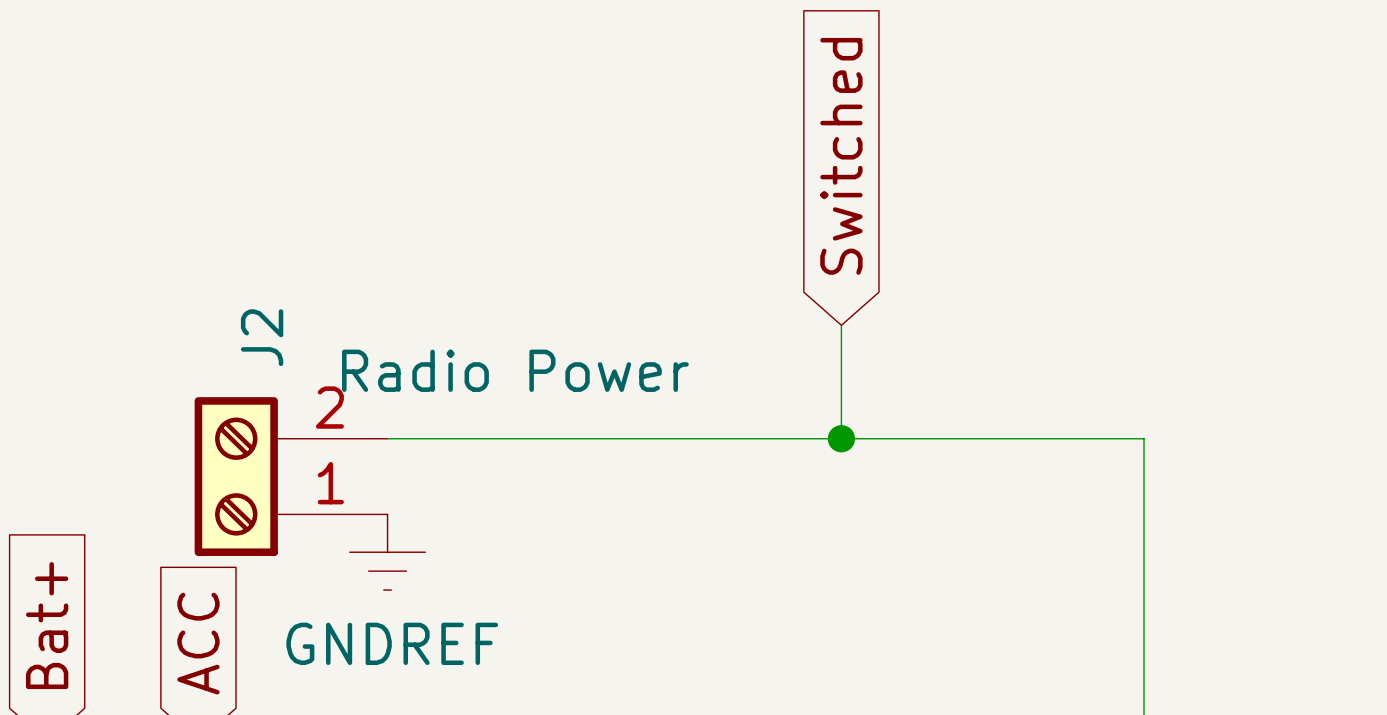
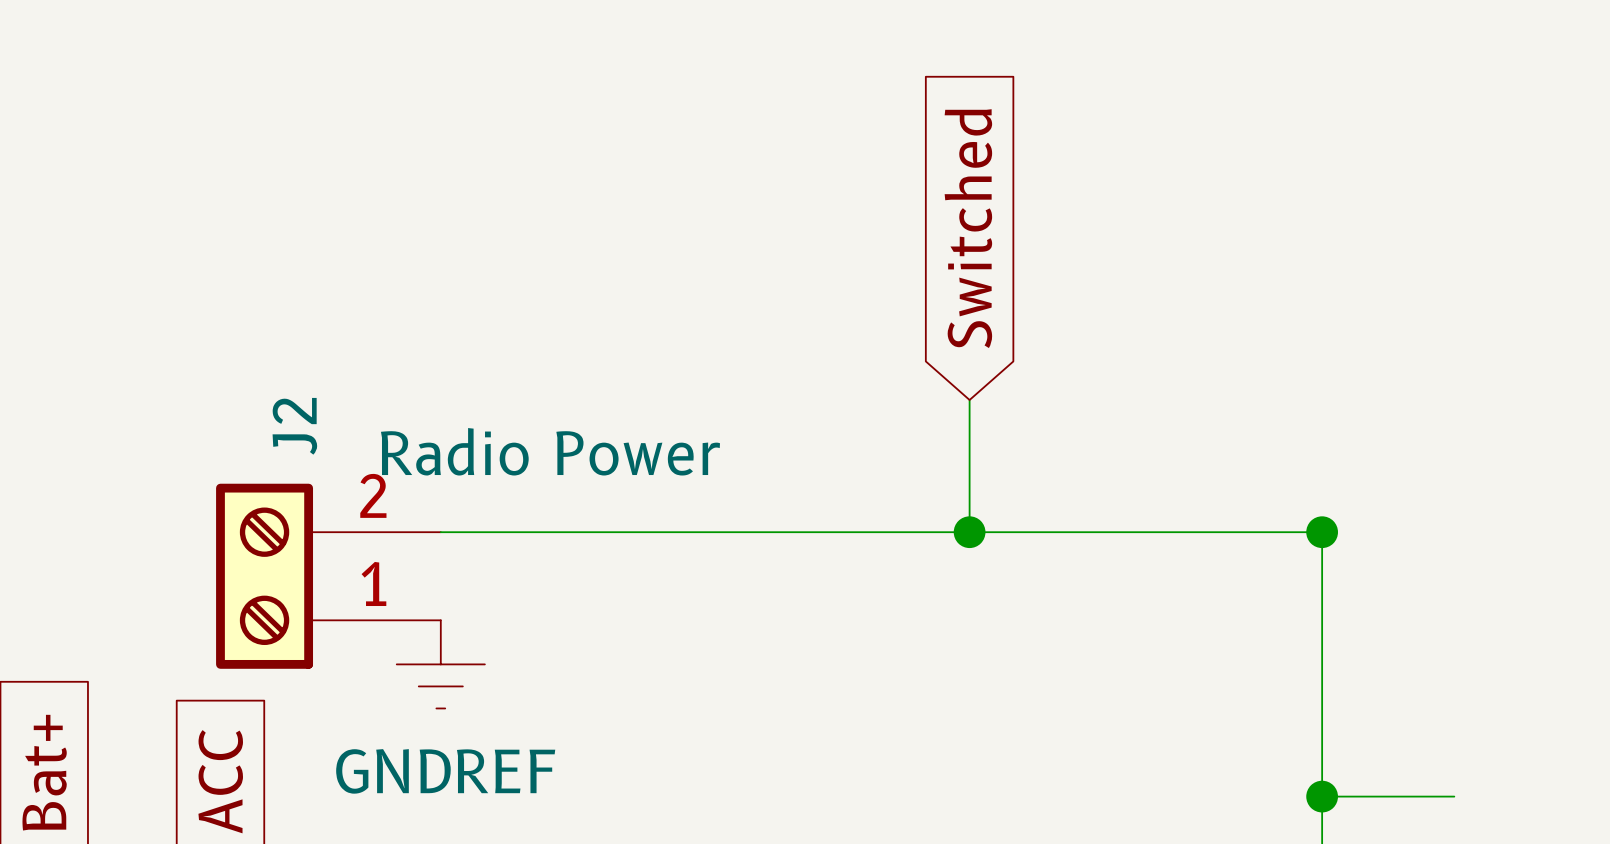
junction: none -> (1322, 532)
wire: none -> (1322, 796) (1454, 796)
junction: none -> (1322, 796)

